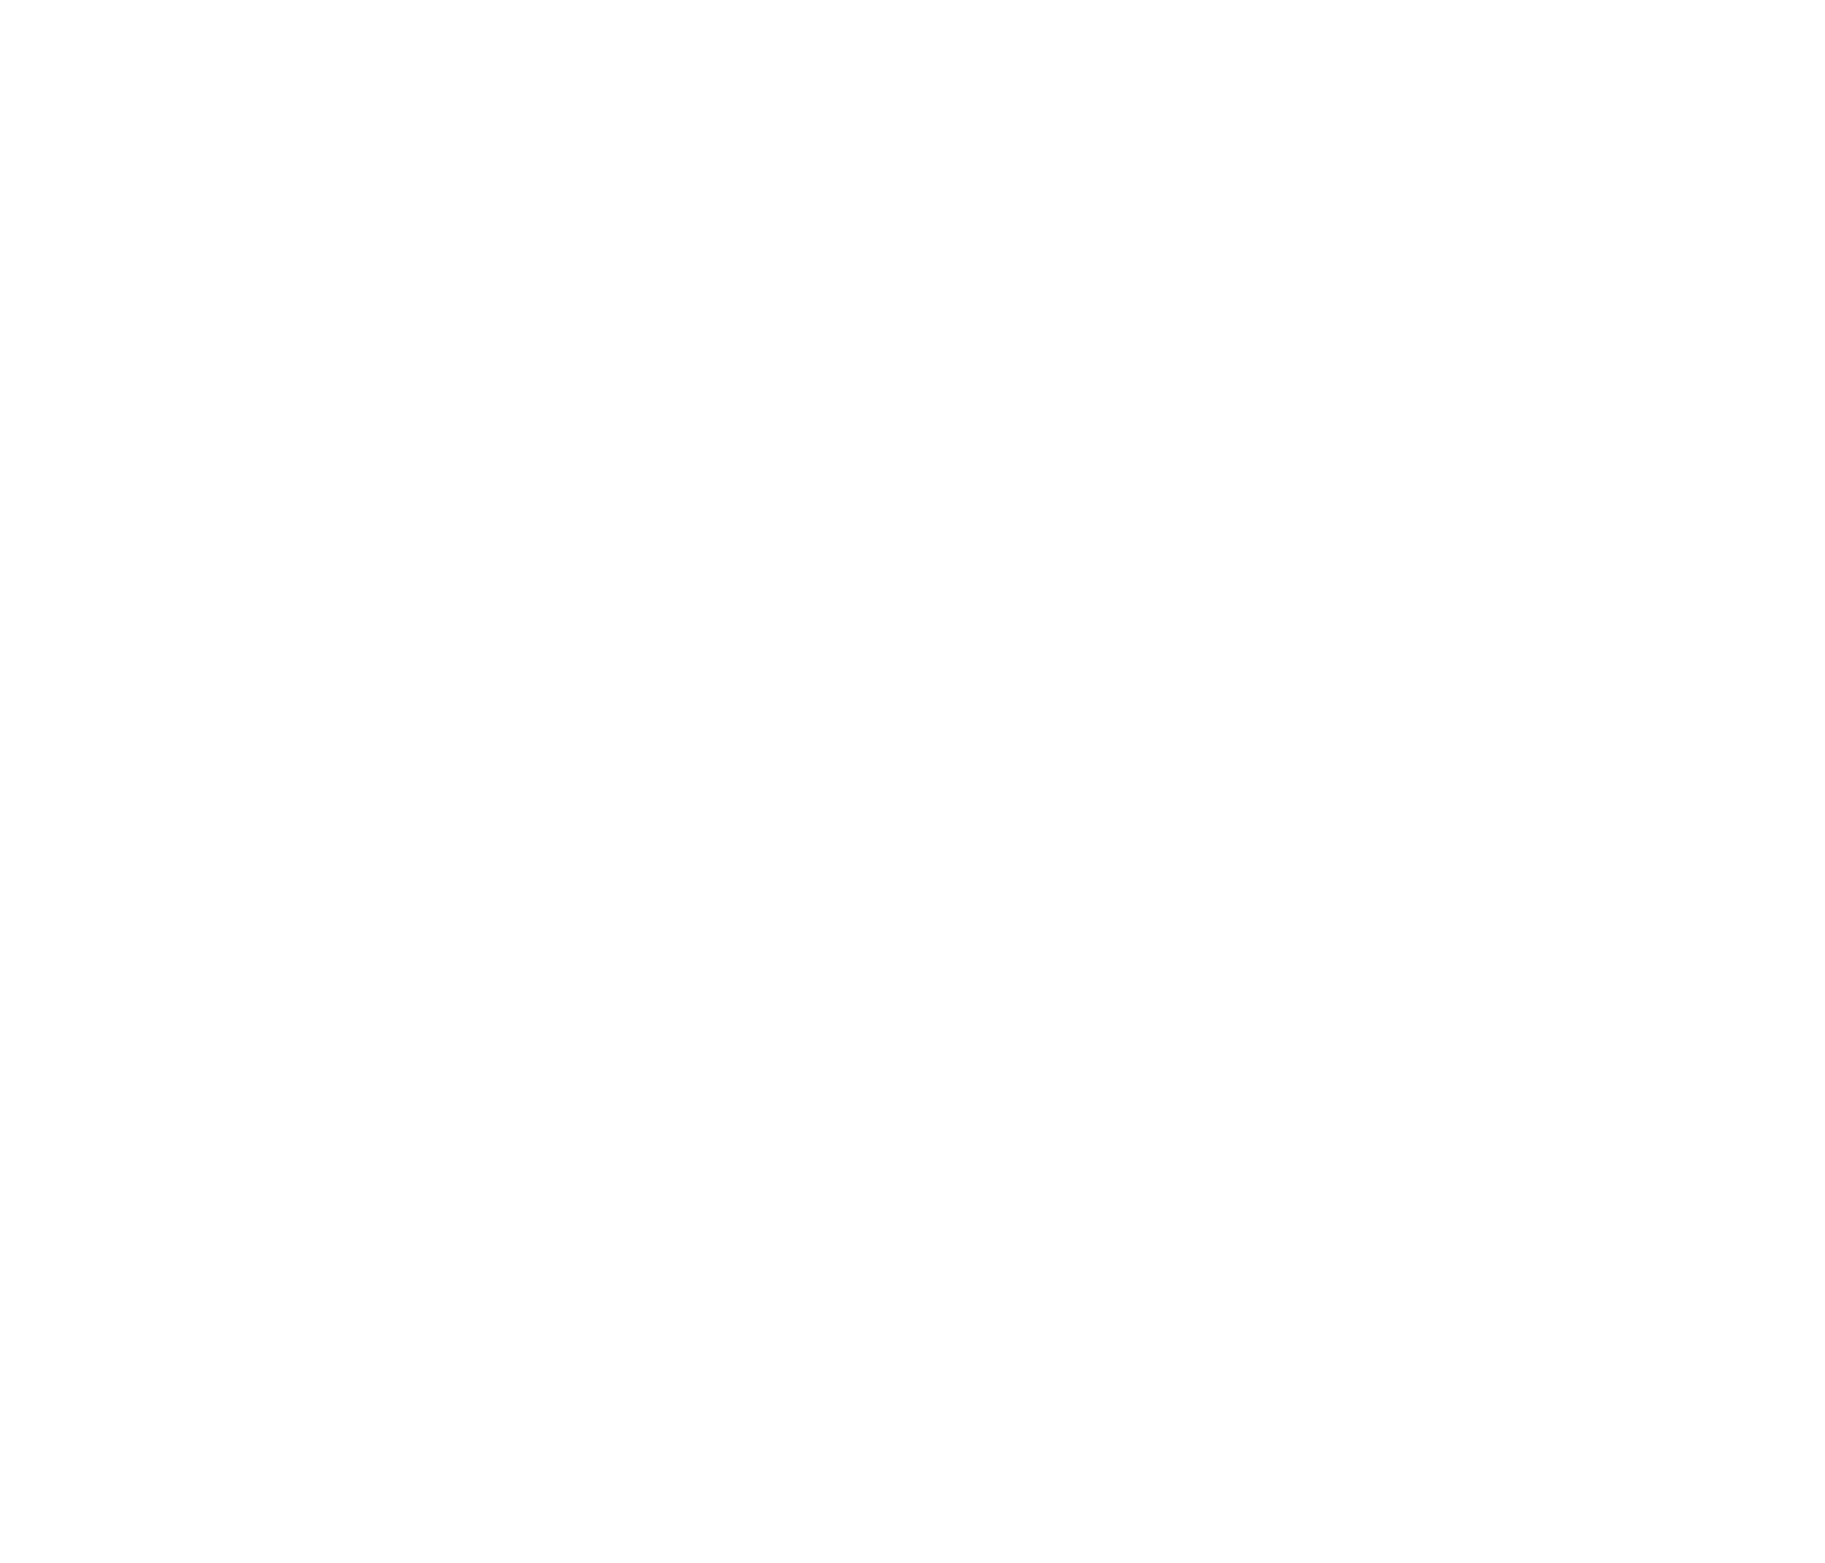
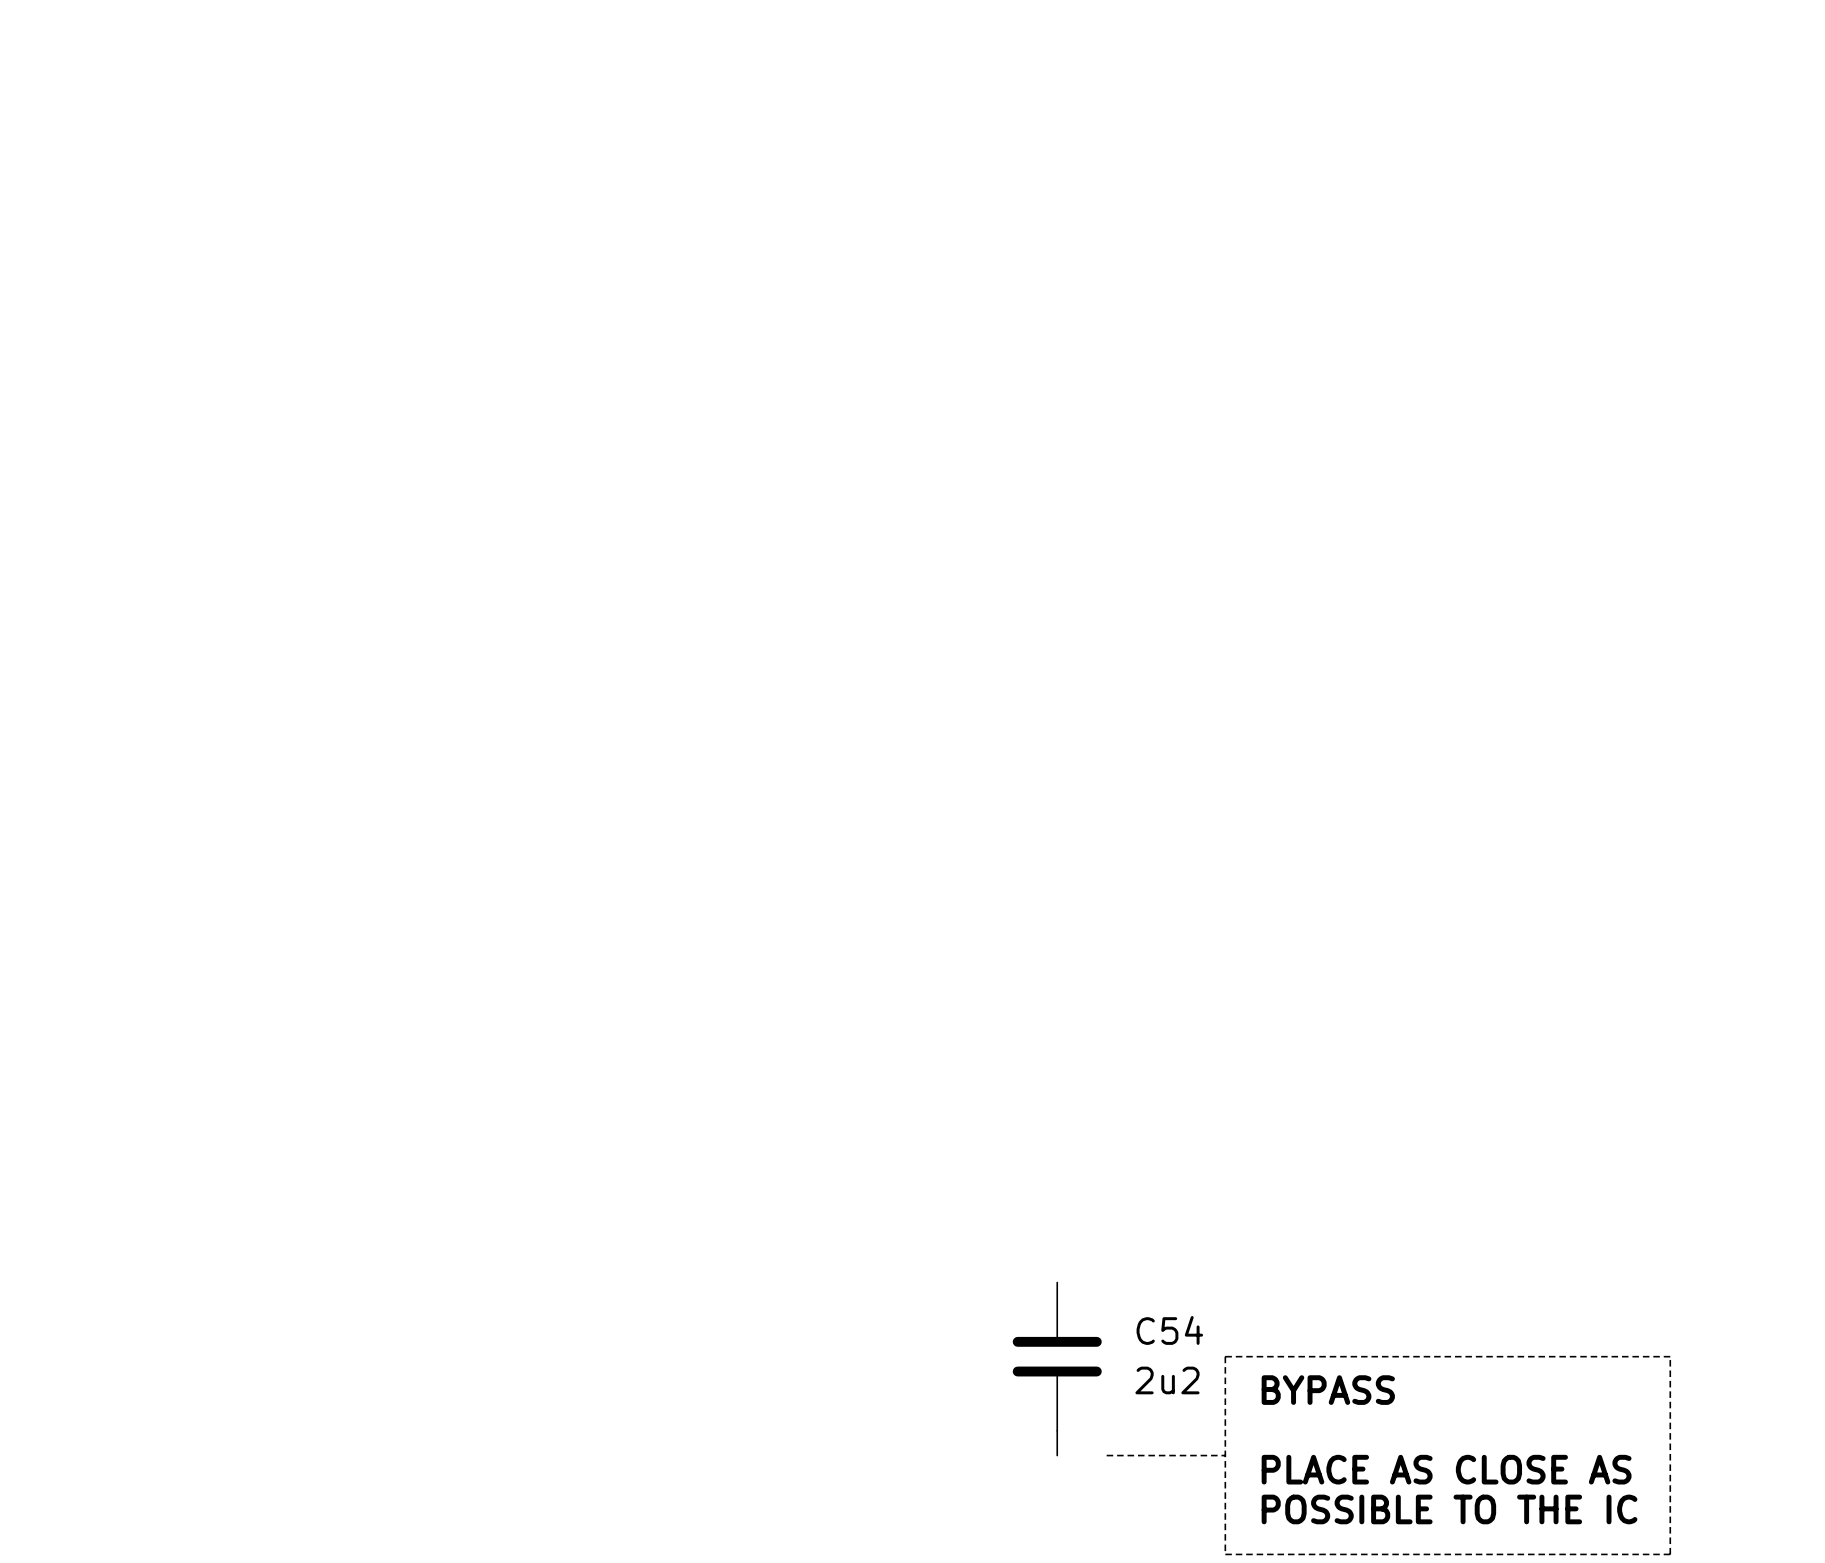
C54: none -> 2u2 (1057, 1356)
line: none -> (1225, 1356) (1225, 1554) (1670, 1554) (1670, 1356) (1225, 1356)
text: none -> BYPASS (1328, 1390)
wire: none -> (1057, 1430) (1057, 1455)
line: none -> (1106, 1455) (1225, 1455)
text: none -> PLACE AS CLOSE AS (1446, 1469)
text: none -> POSSIBLE TO THE IC (1449, 1509)

